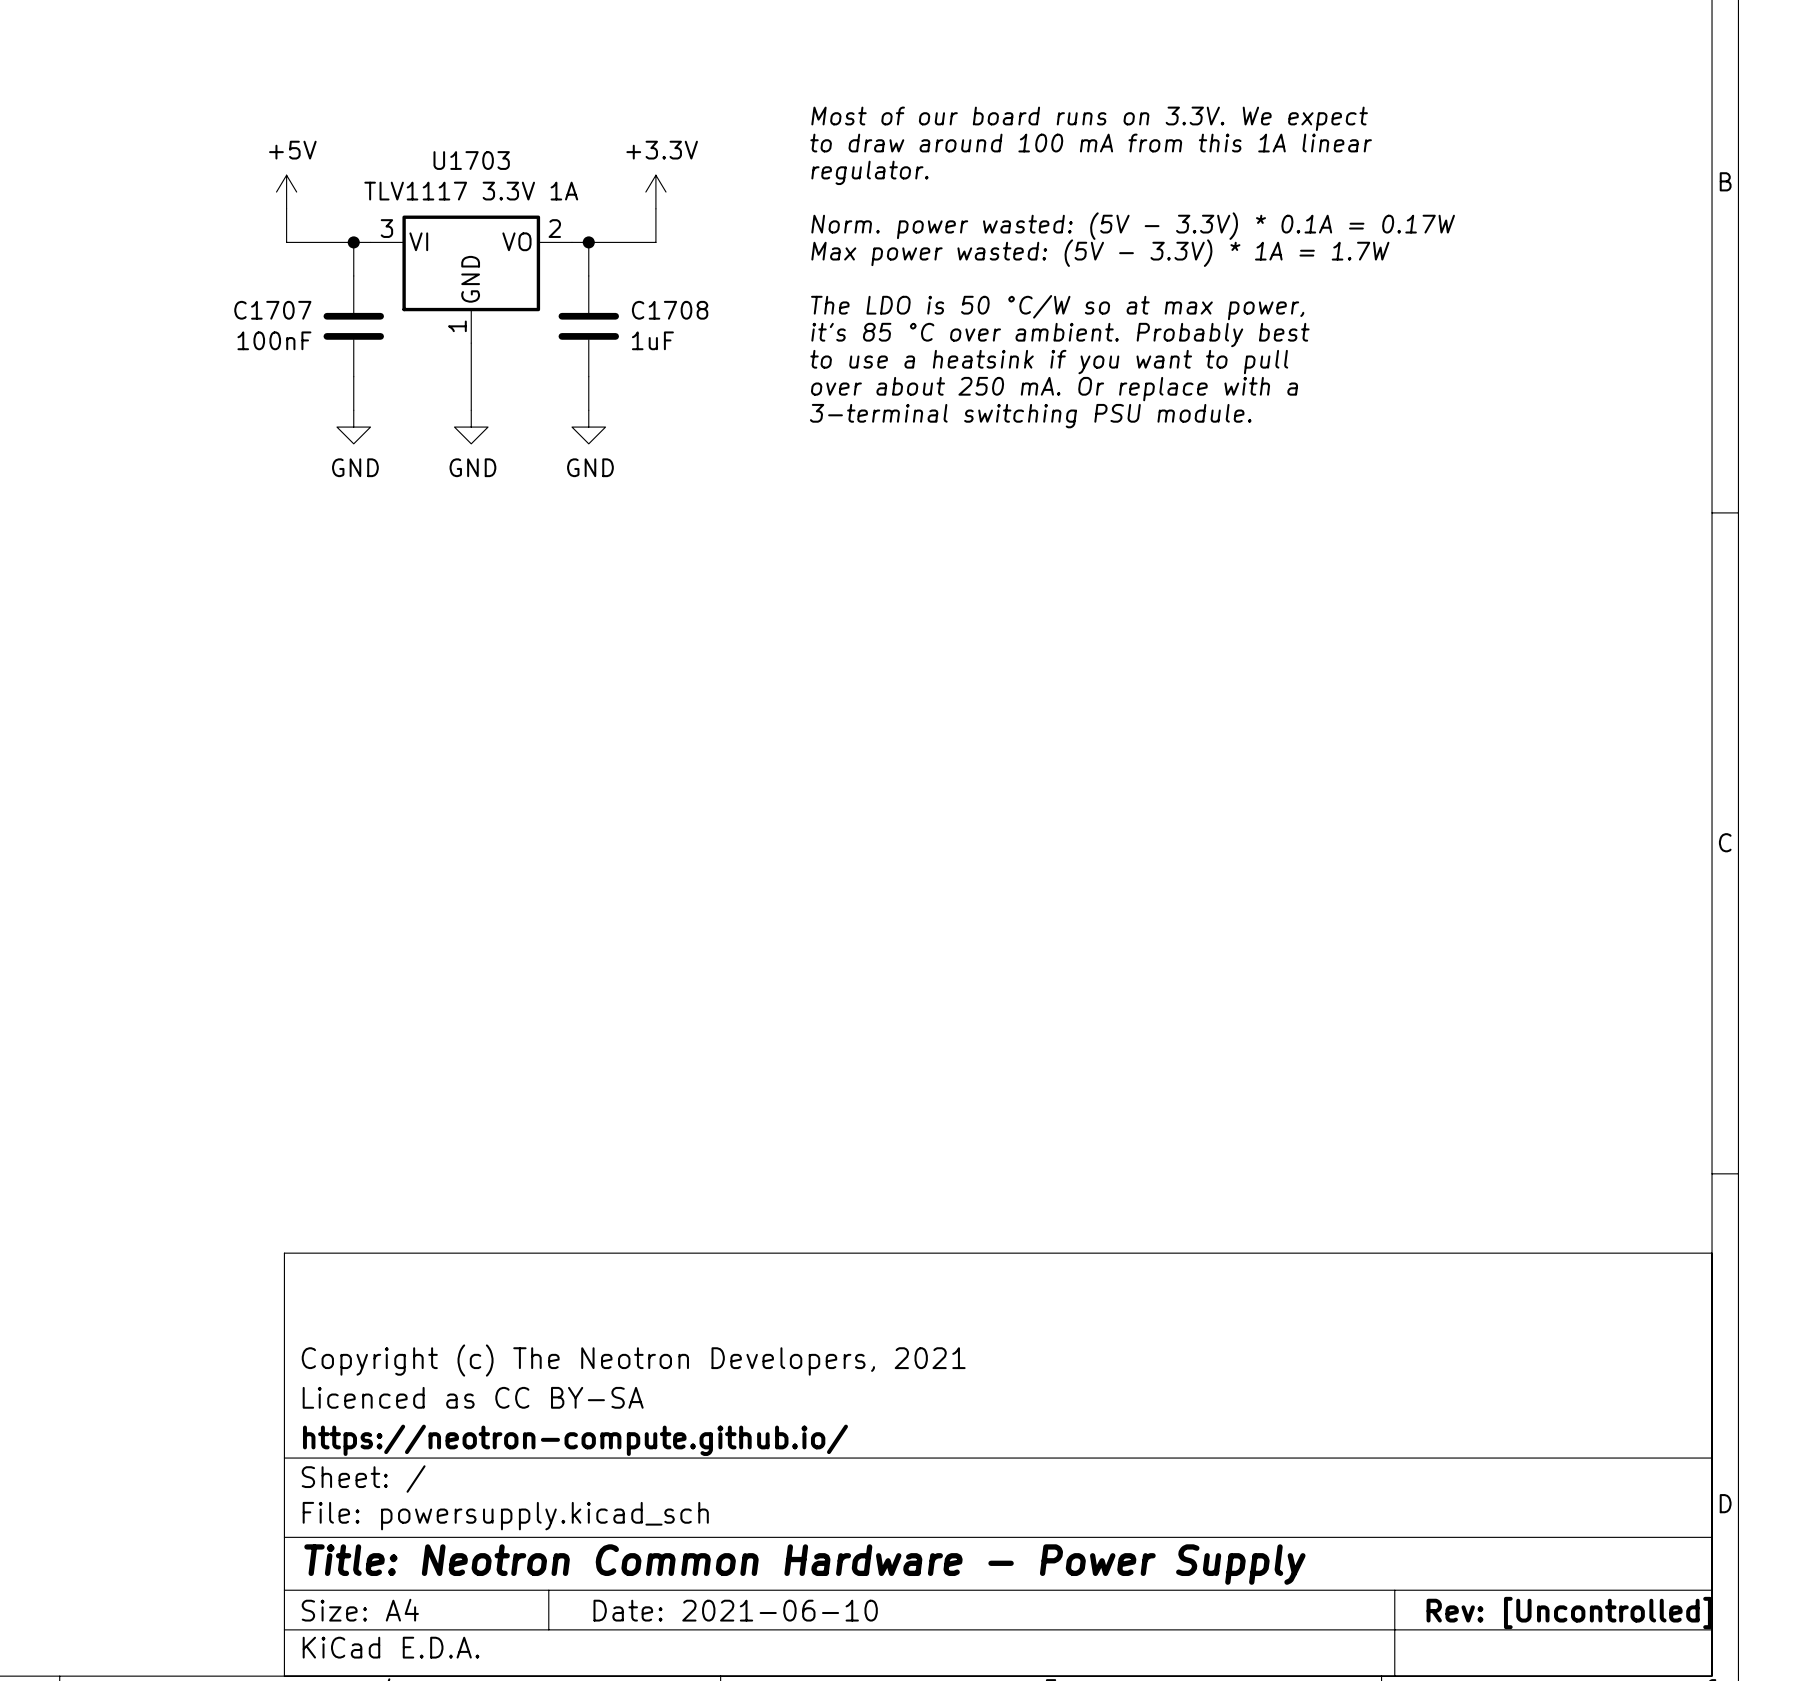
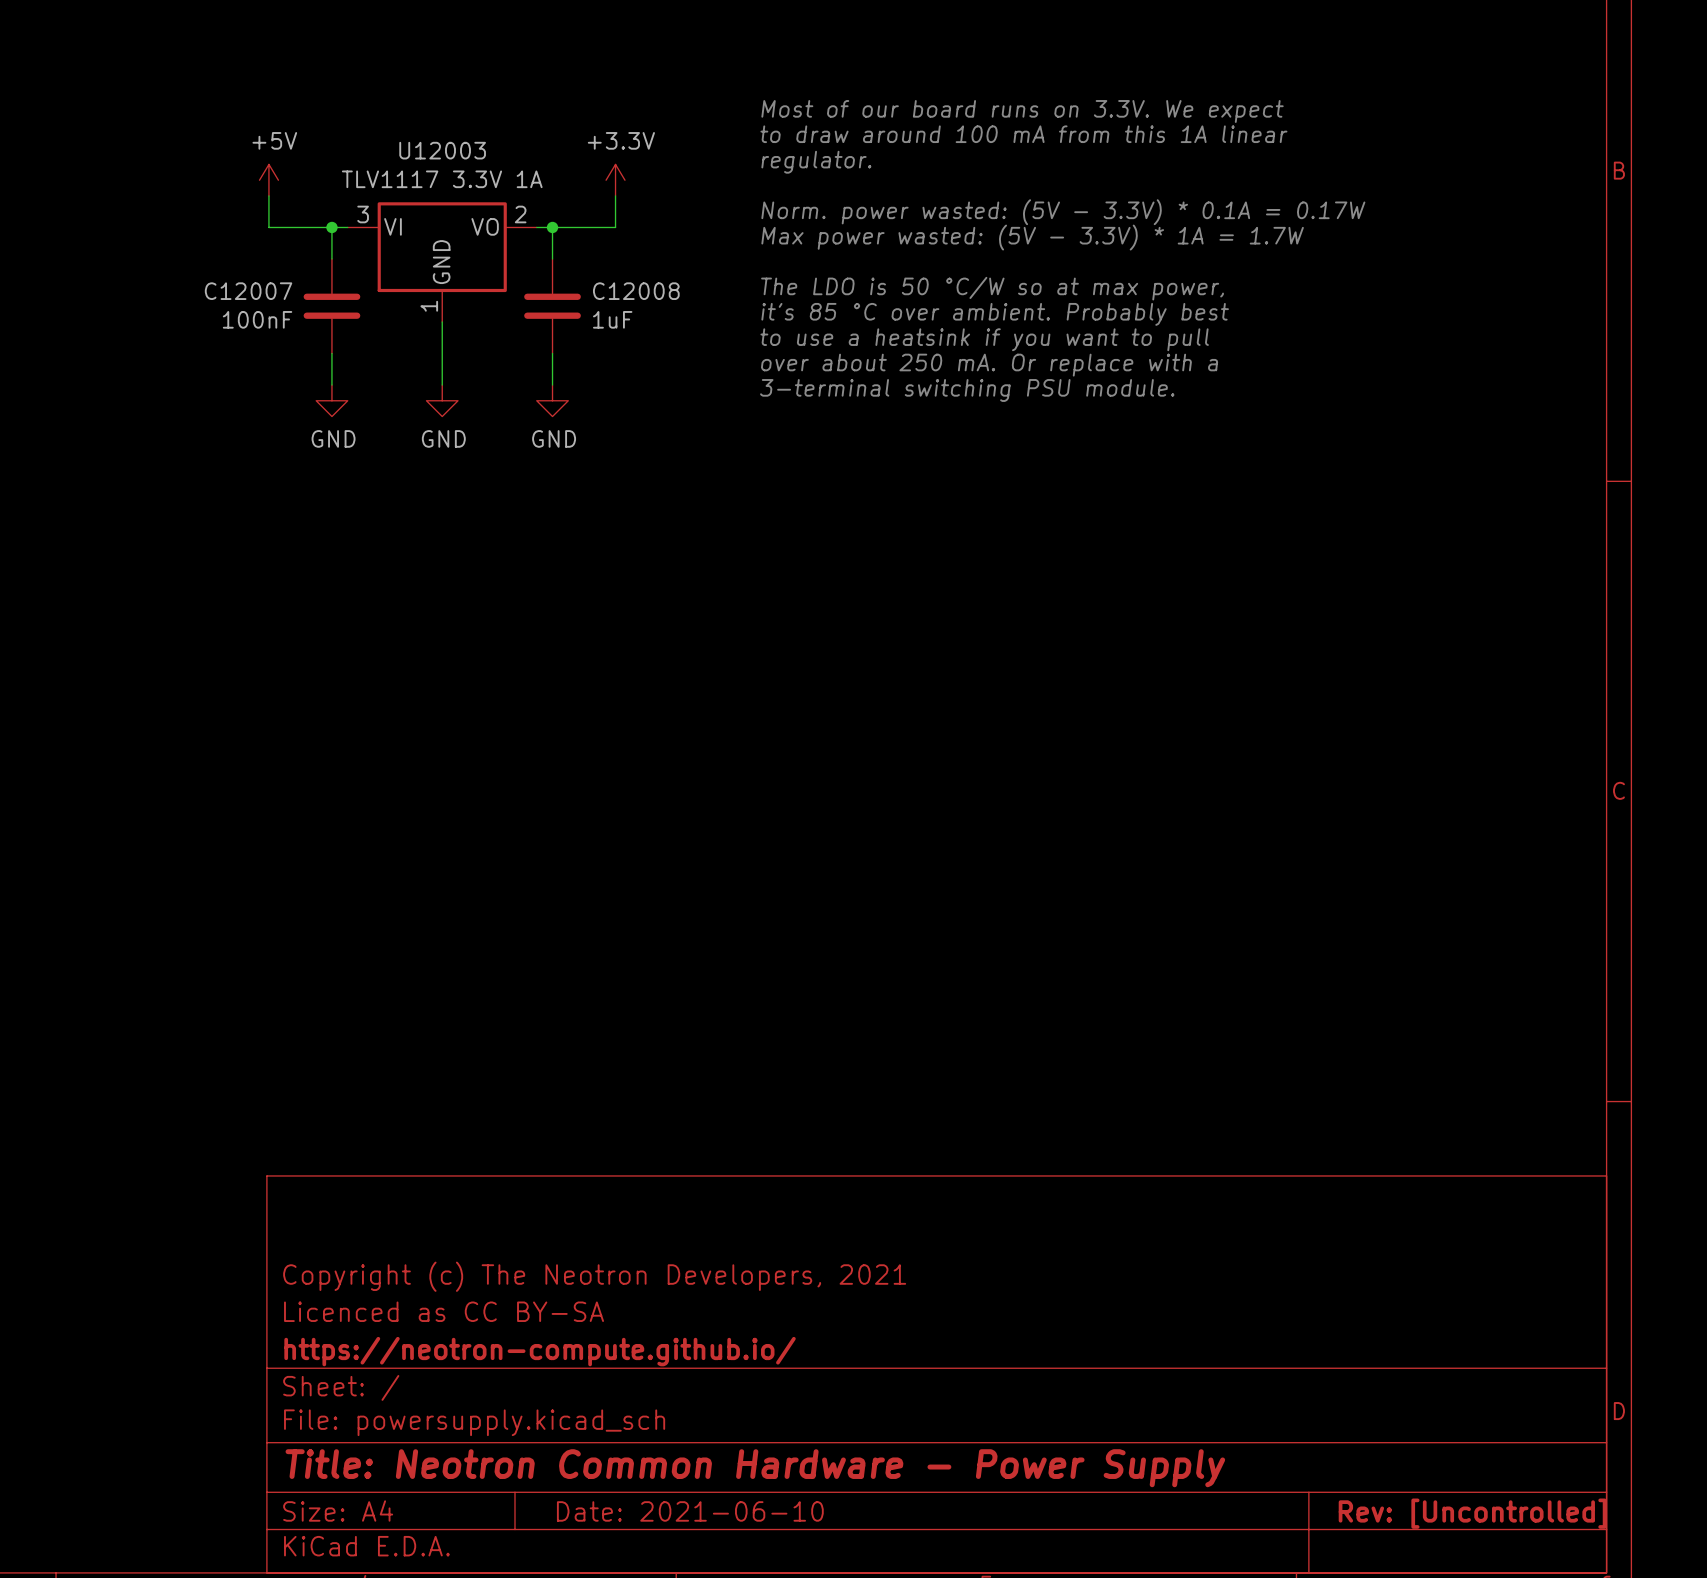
U1703 name: U1703 (471, 160) -> U12003 (442, 150)
C1707 name: C1707 (272, 310) -> C12007 (248, 291)
C1708 name: C1708 (670, 310) -> C12008 (636, 291)

